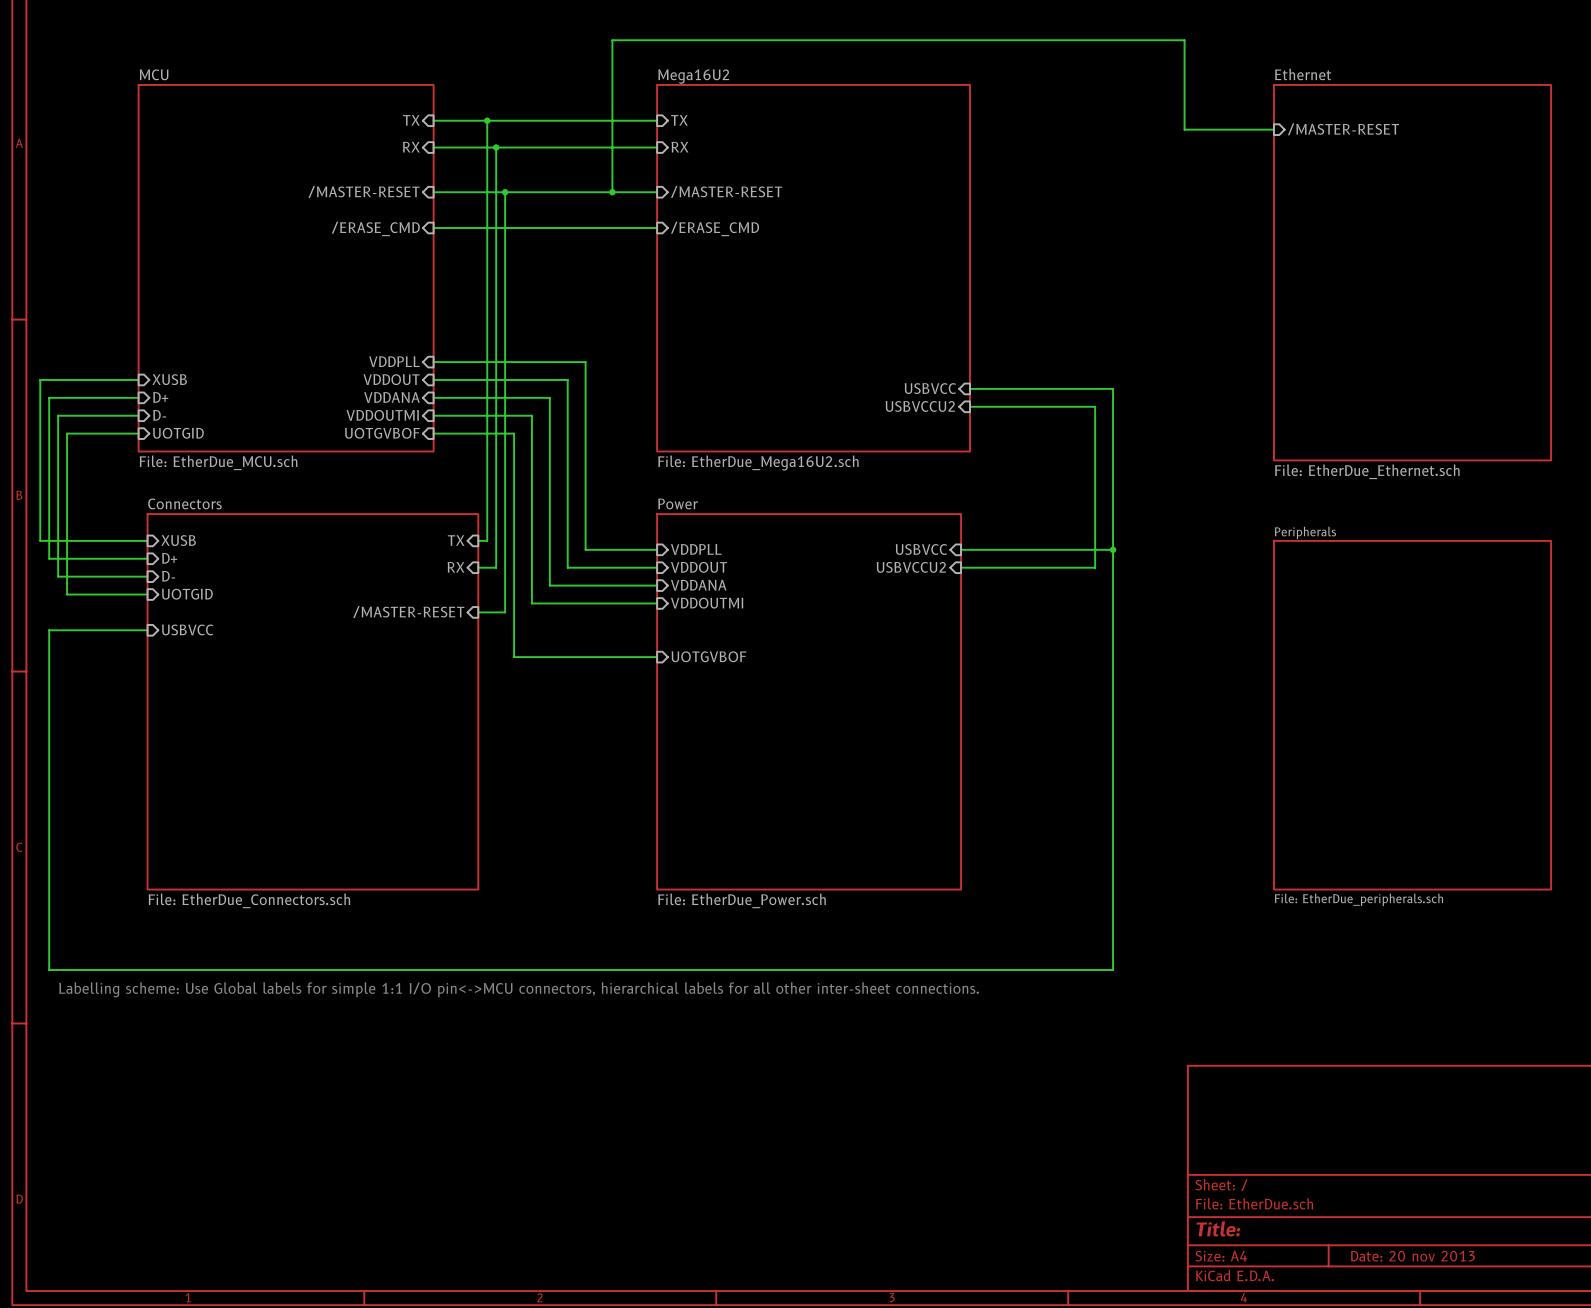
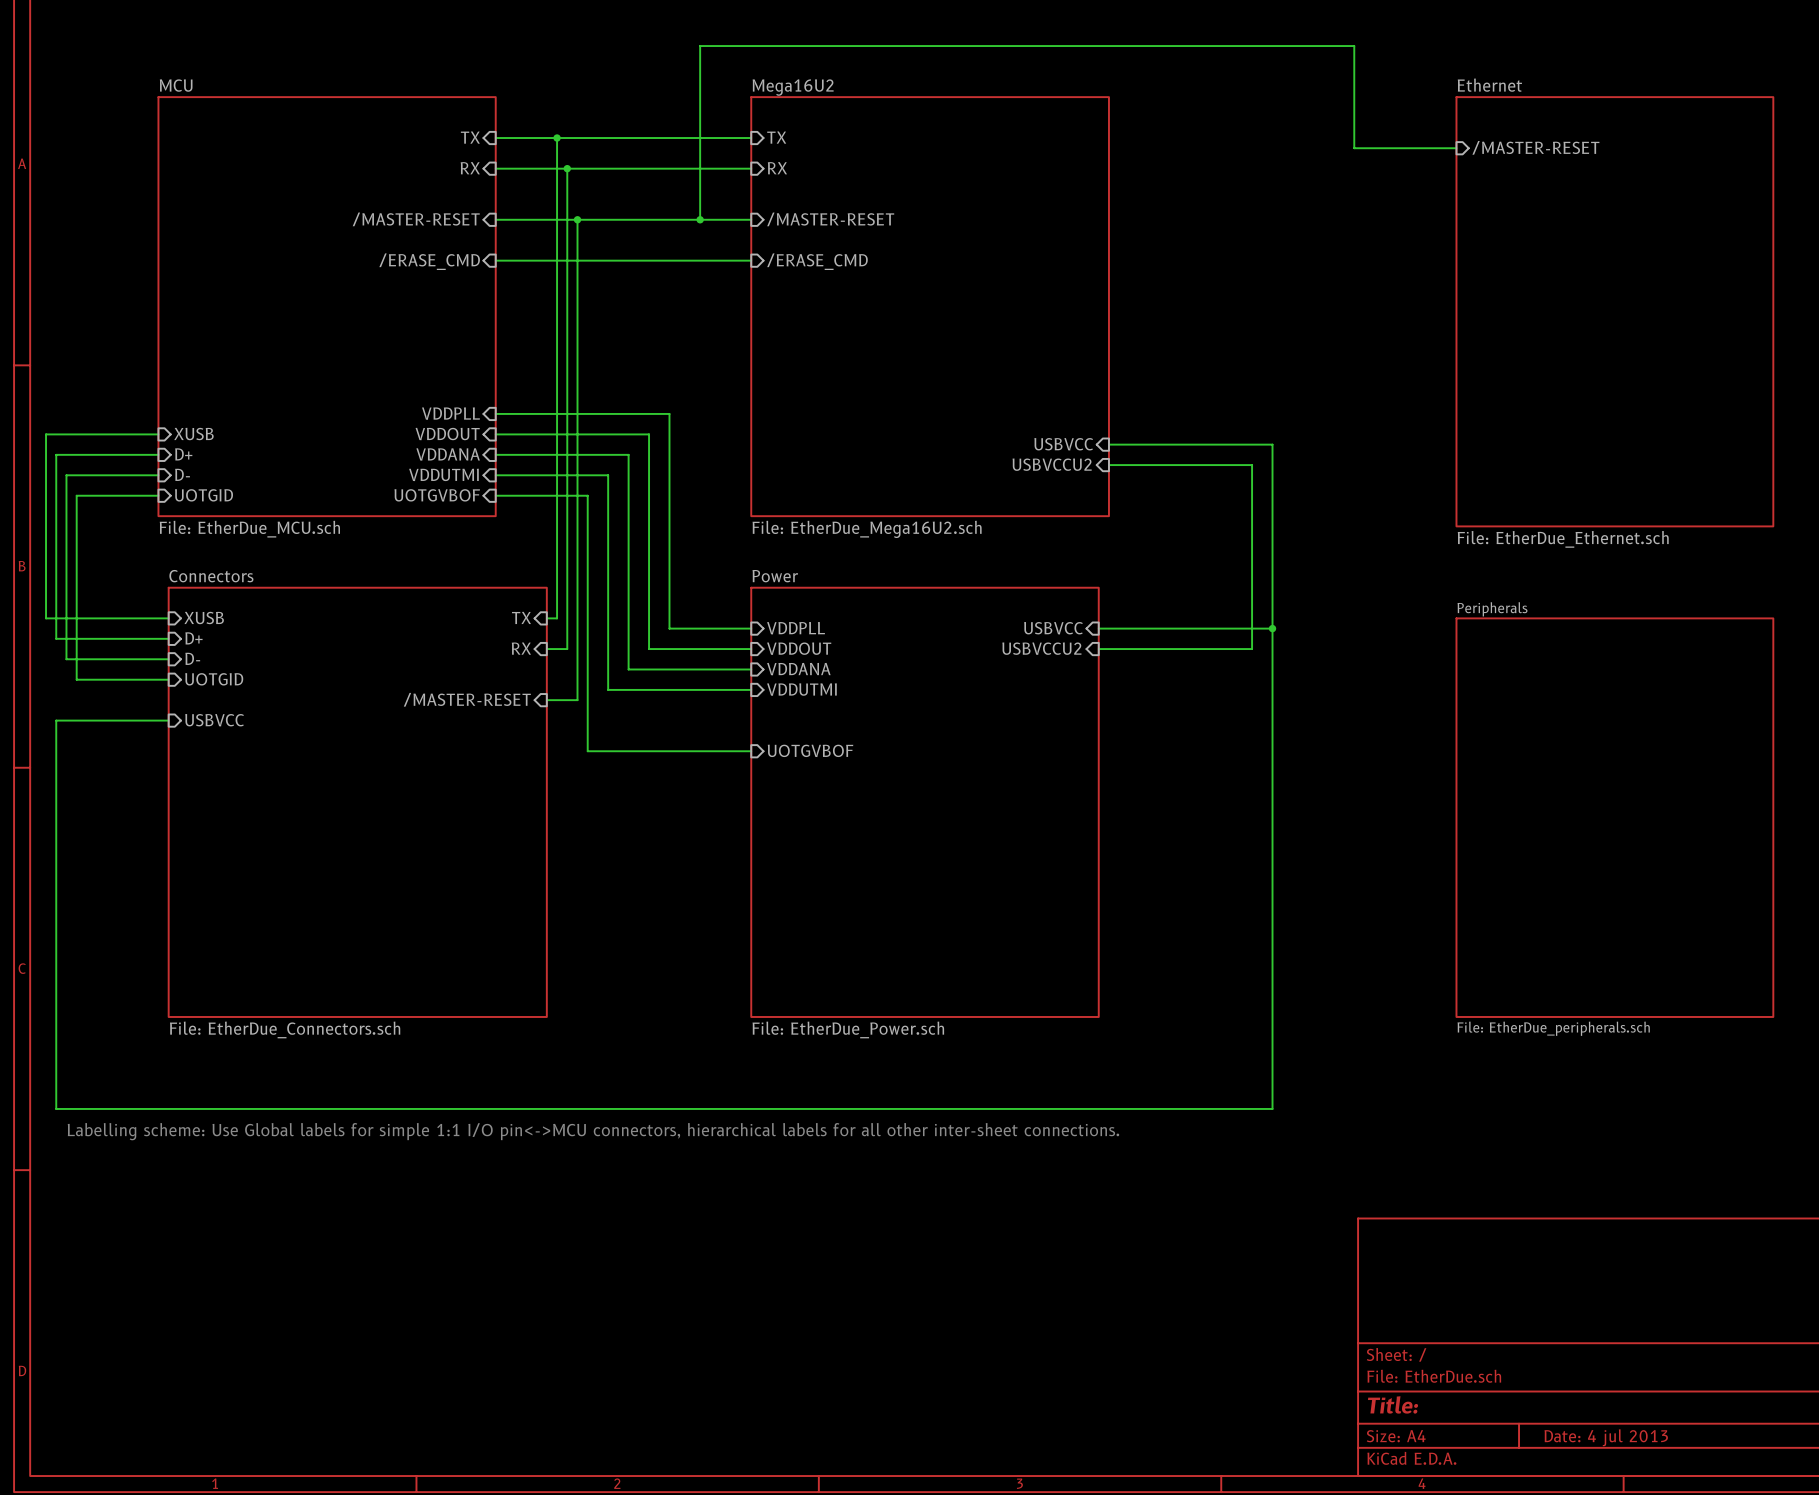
sheet pin: VDDOUTMI (382, 415) -> VDDUTMI (443, 474)
sheet pin: VDDOUTMI (707, 603) -> VDDUTMI (801, 689)
title block: Date: 20 nov 2013 (1412, 1256) -> Date: 4 jul 2013 (1606, 1437)

